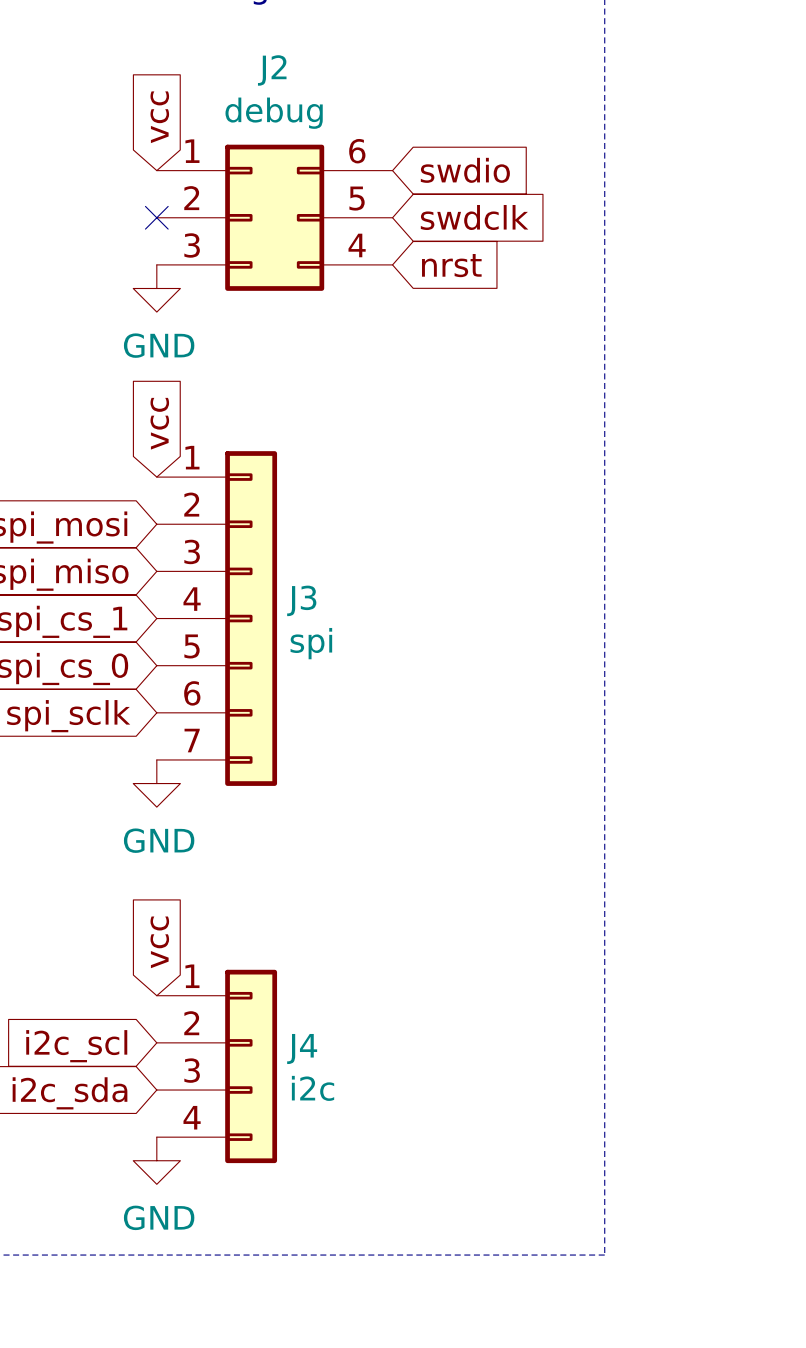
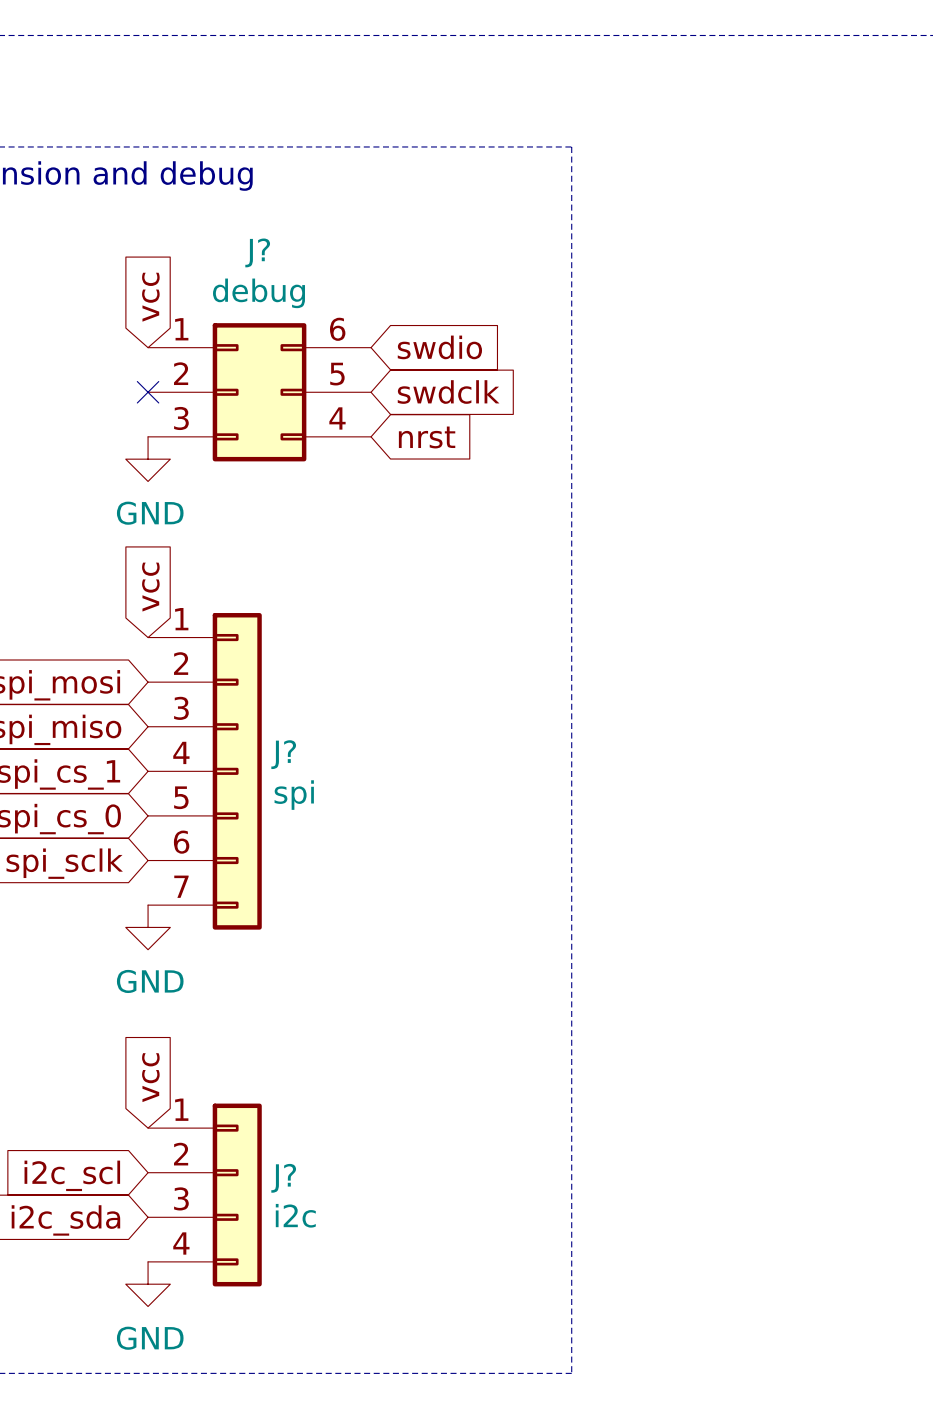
J2 name: J2 (272, 70) -> J? (257, 252)
J3 name: J3 (301, 600) -> J? (283, 754)
J4 name: J4 (302, 1048) -> J? (283, 1178)

